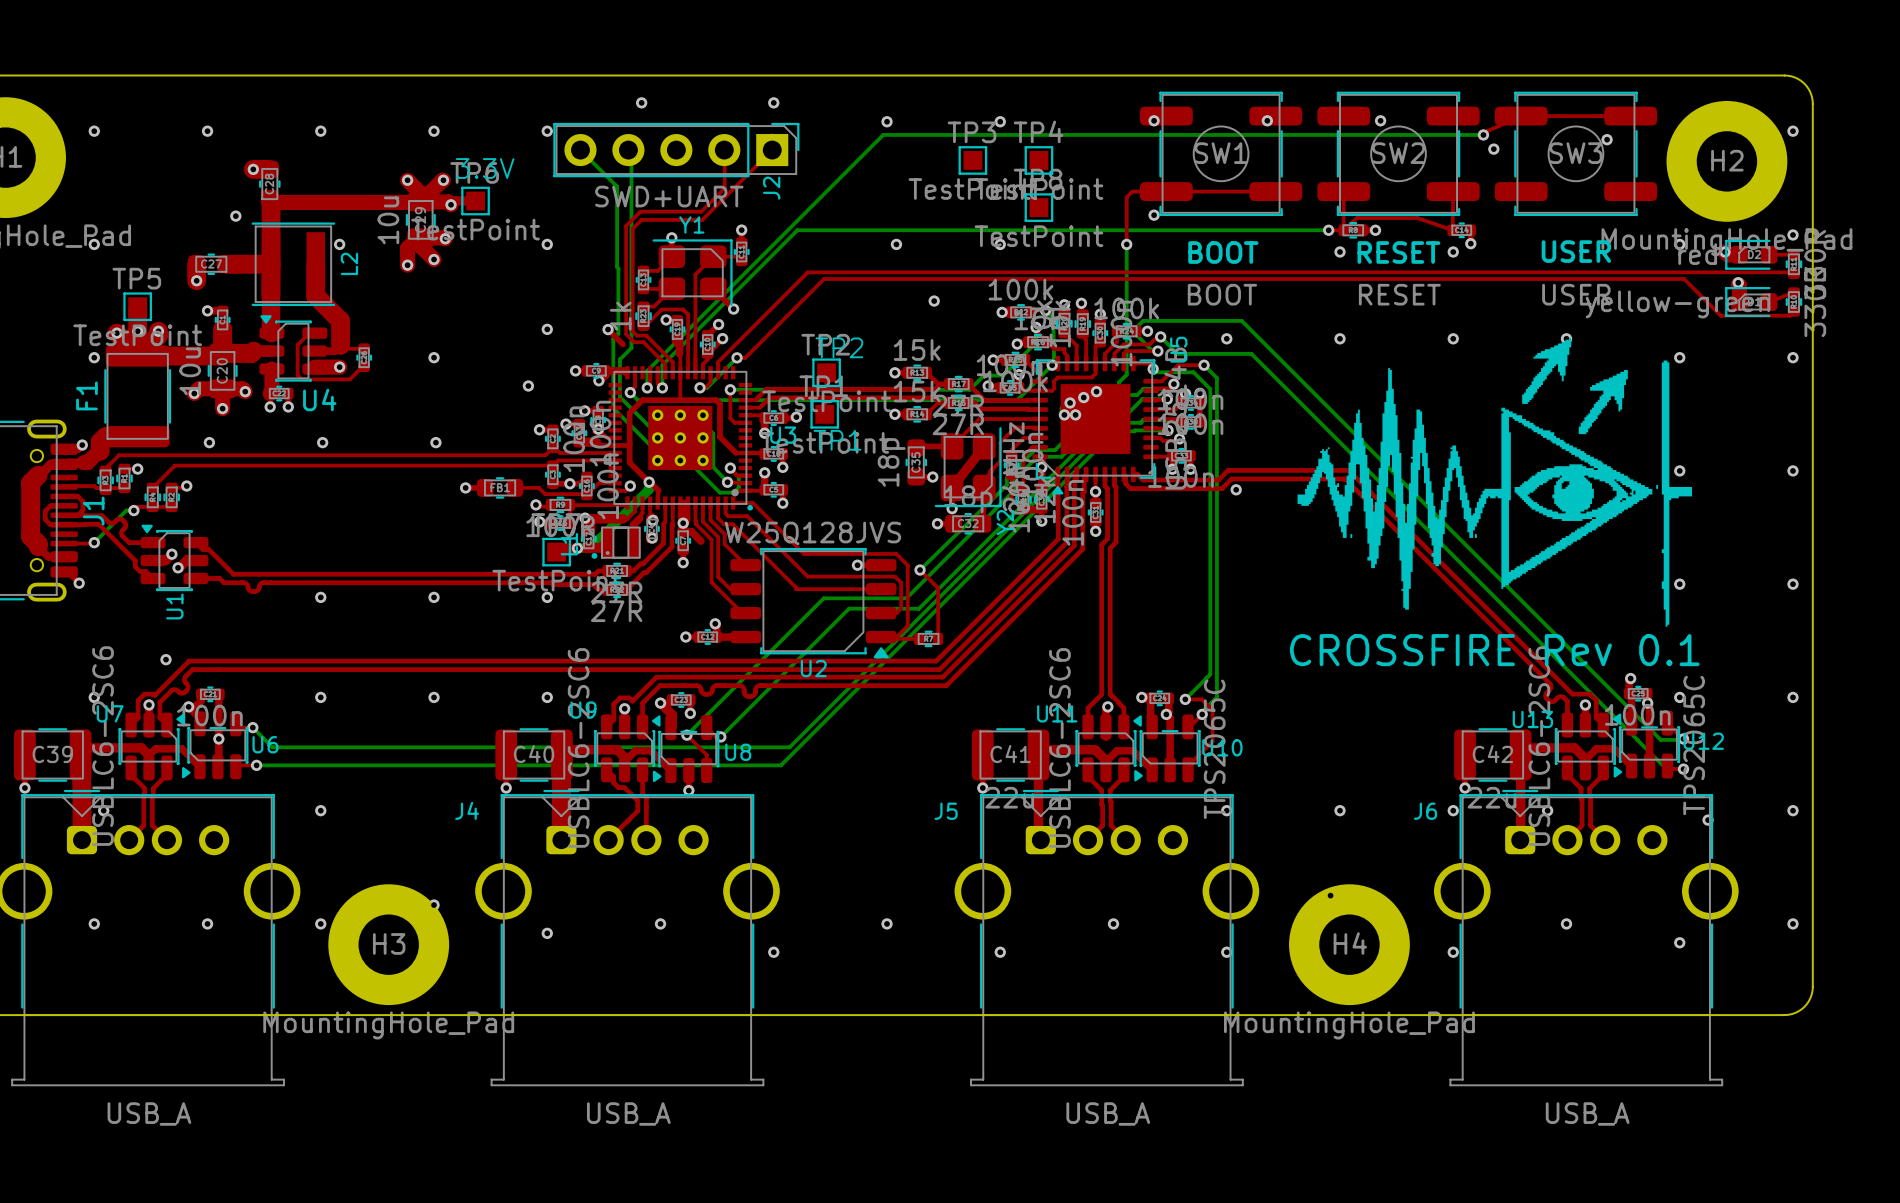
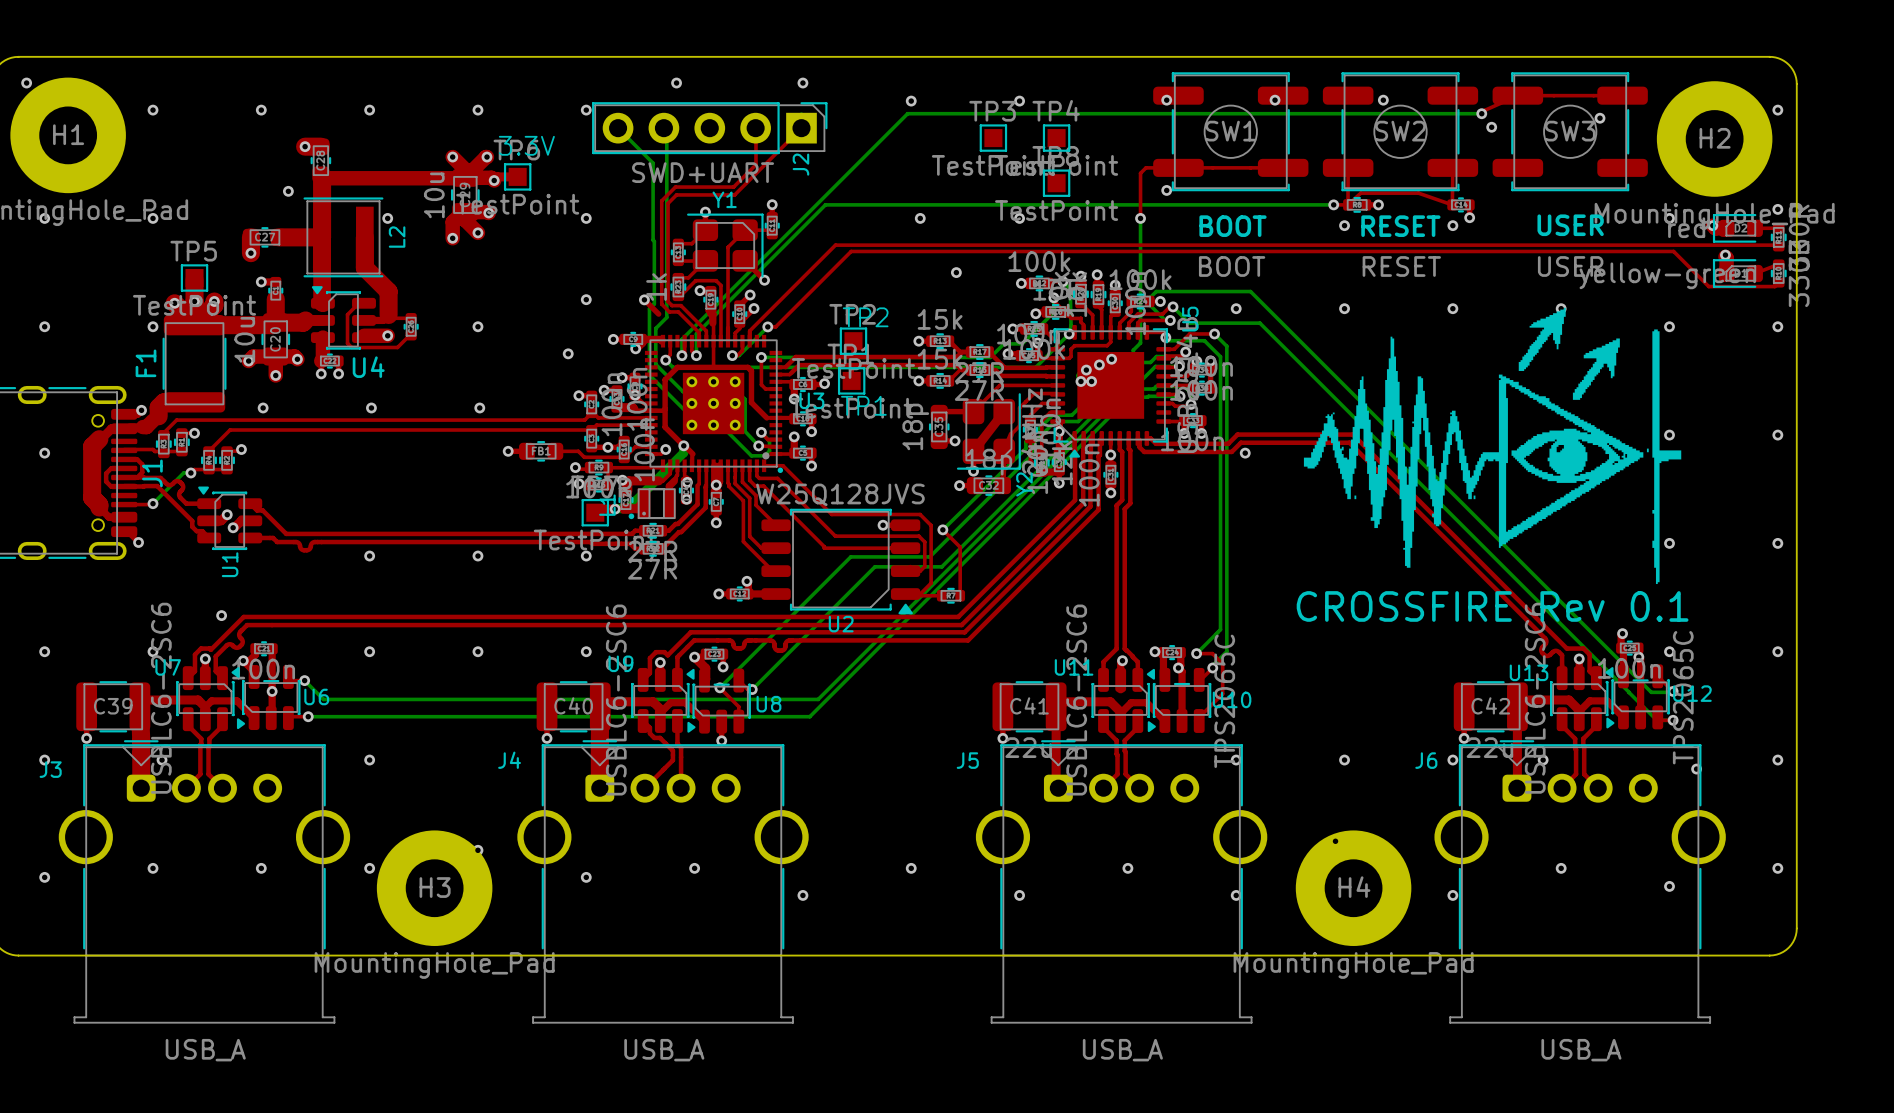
top track: (683, 531) (691, 531) (700, 541) -> none

